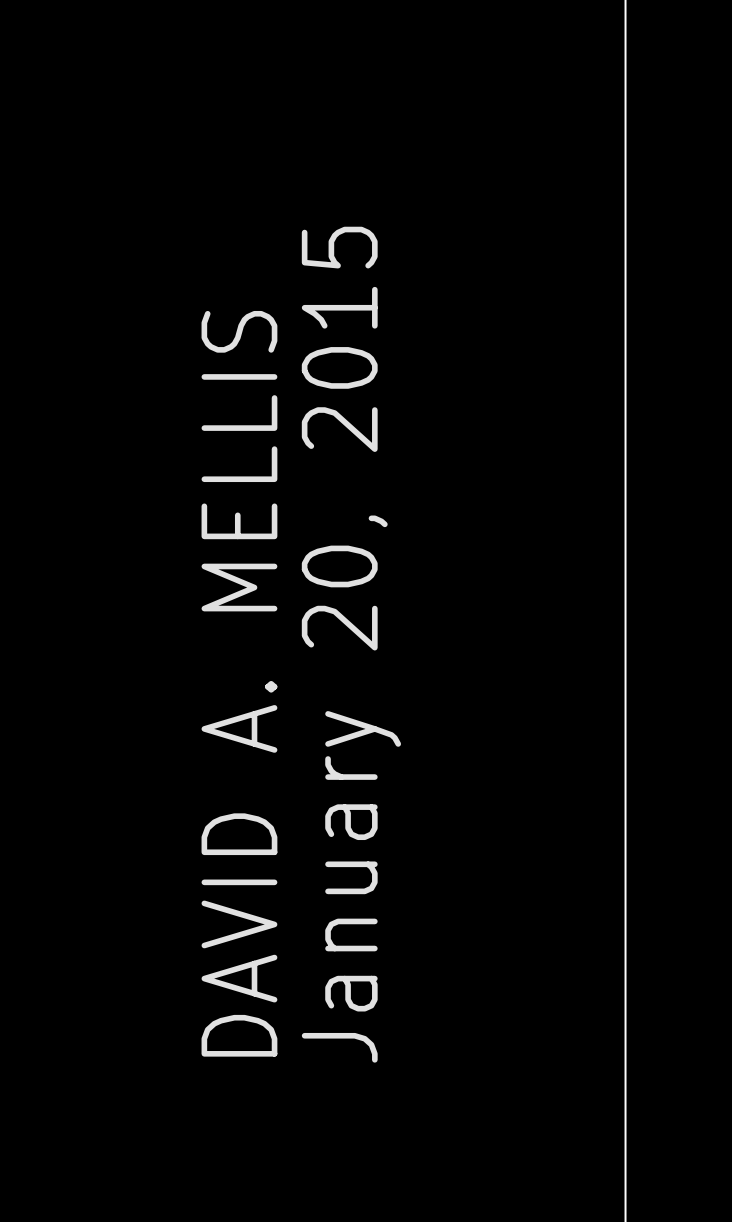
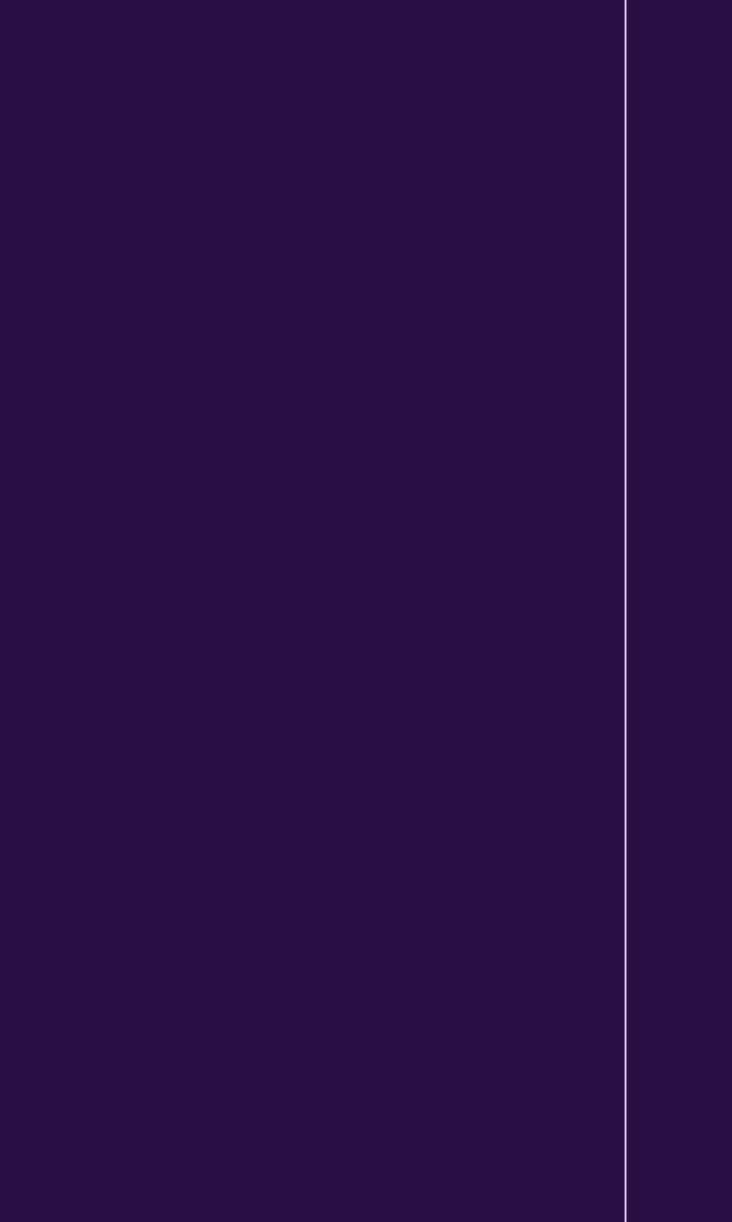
text: January 20, 2015 (351, 644) -> none
text: DAVID A. MELLIS (239, 683) -> none

